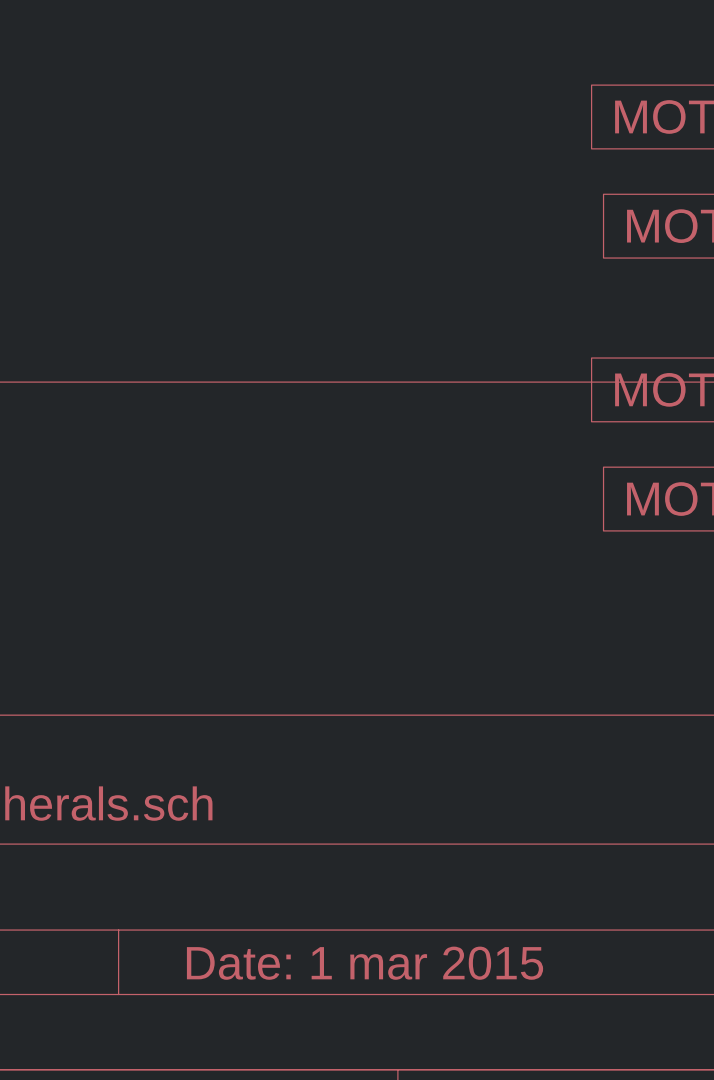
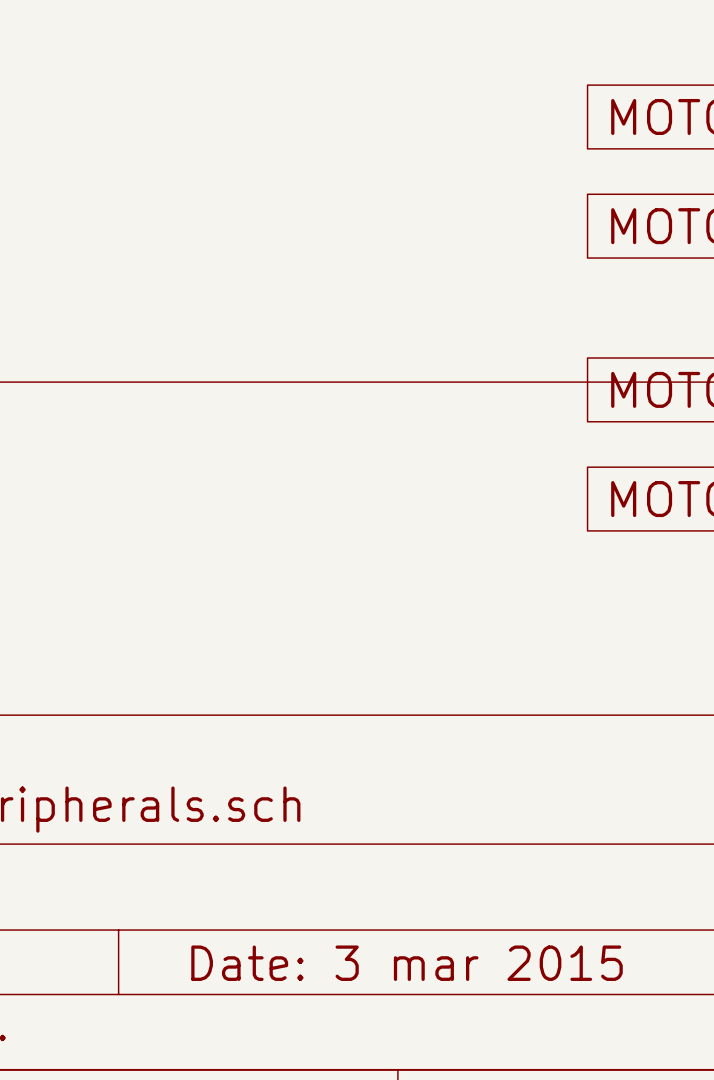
title block: Date: 1 mar 2015 (365, 963) -> Date: 3 mar 2015 (407, 963)

